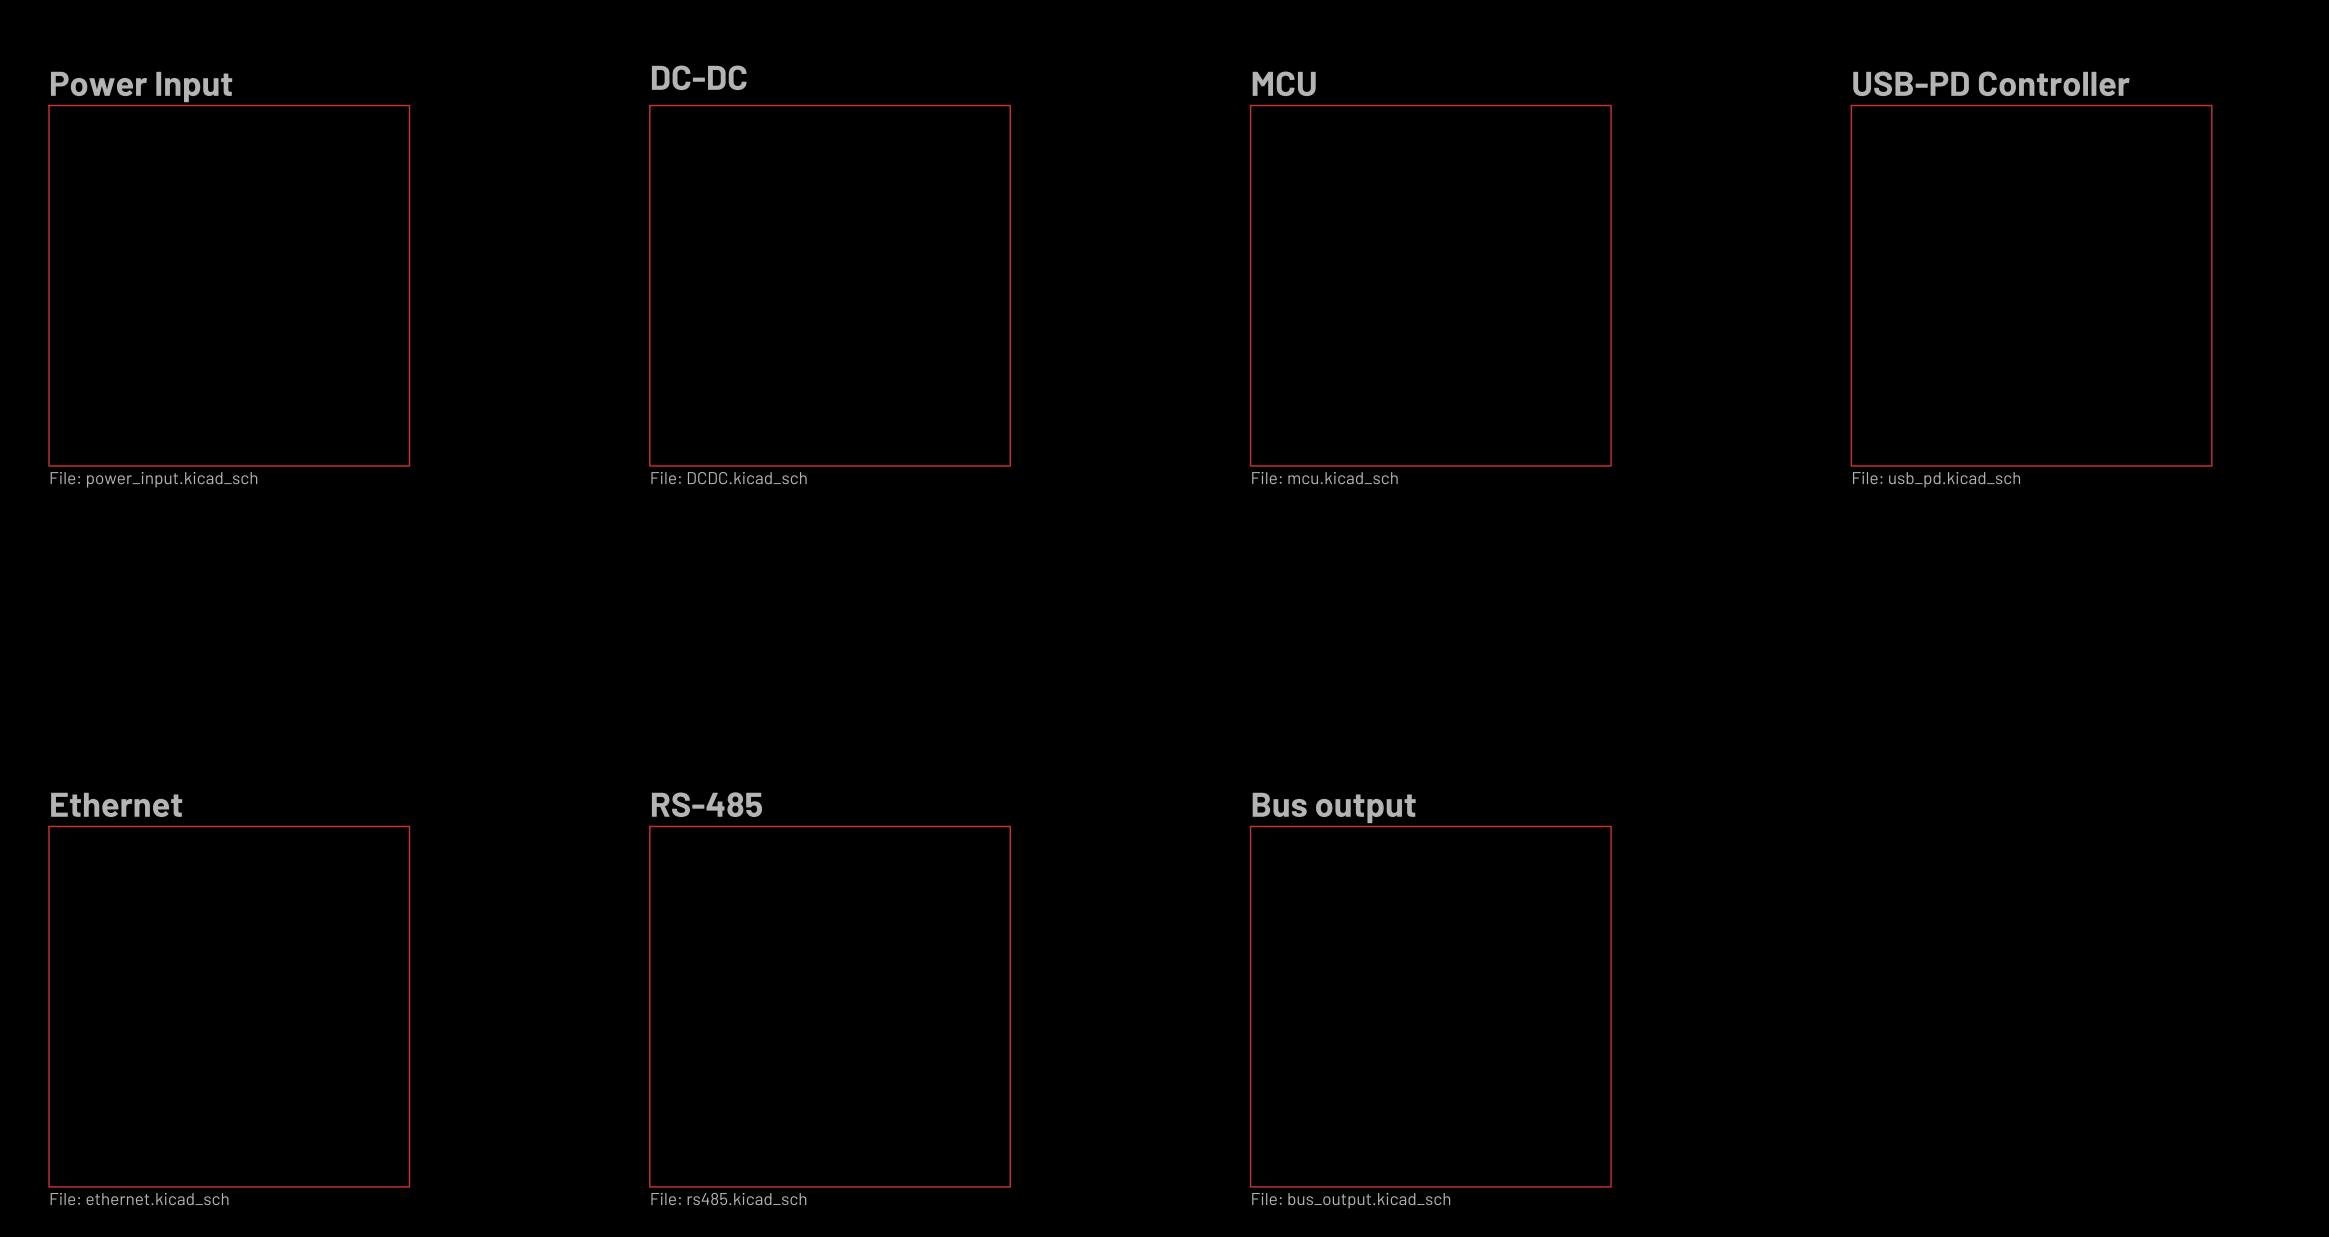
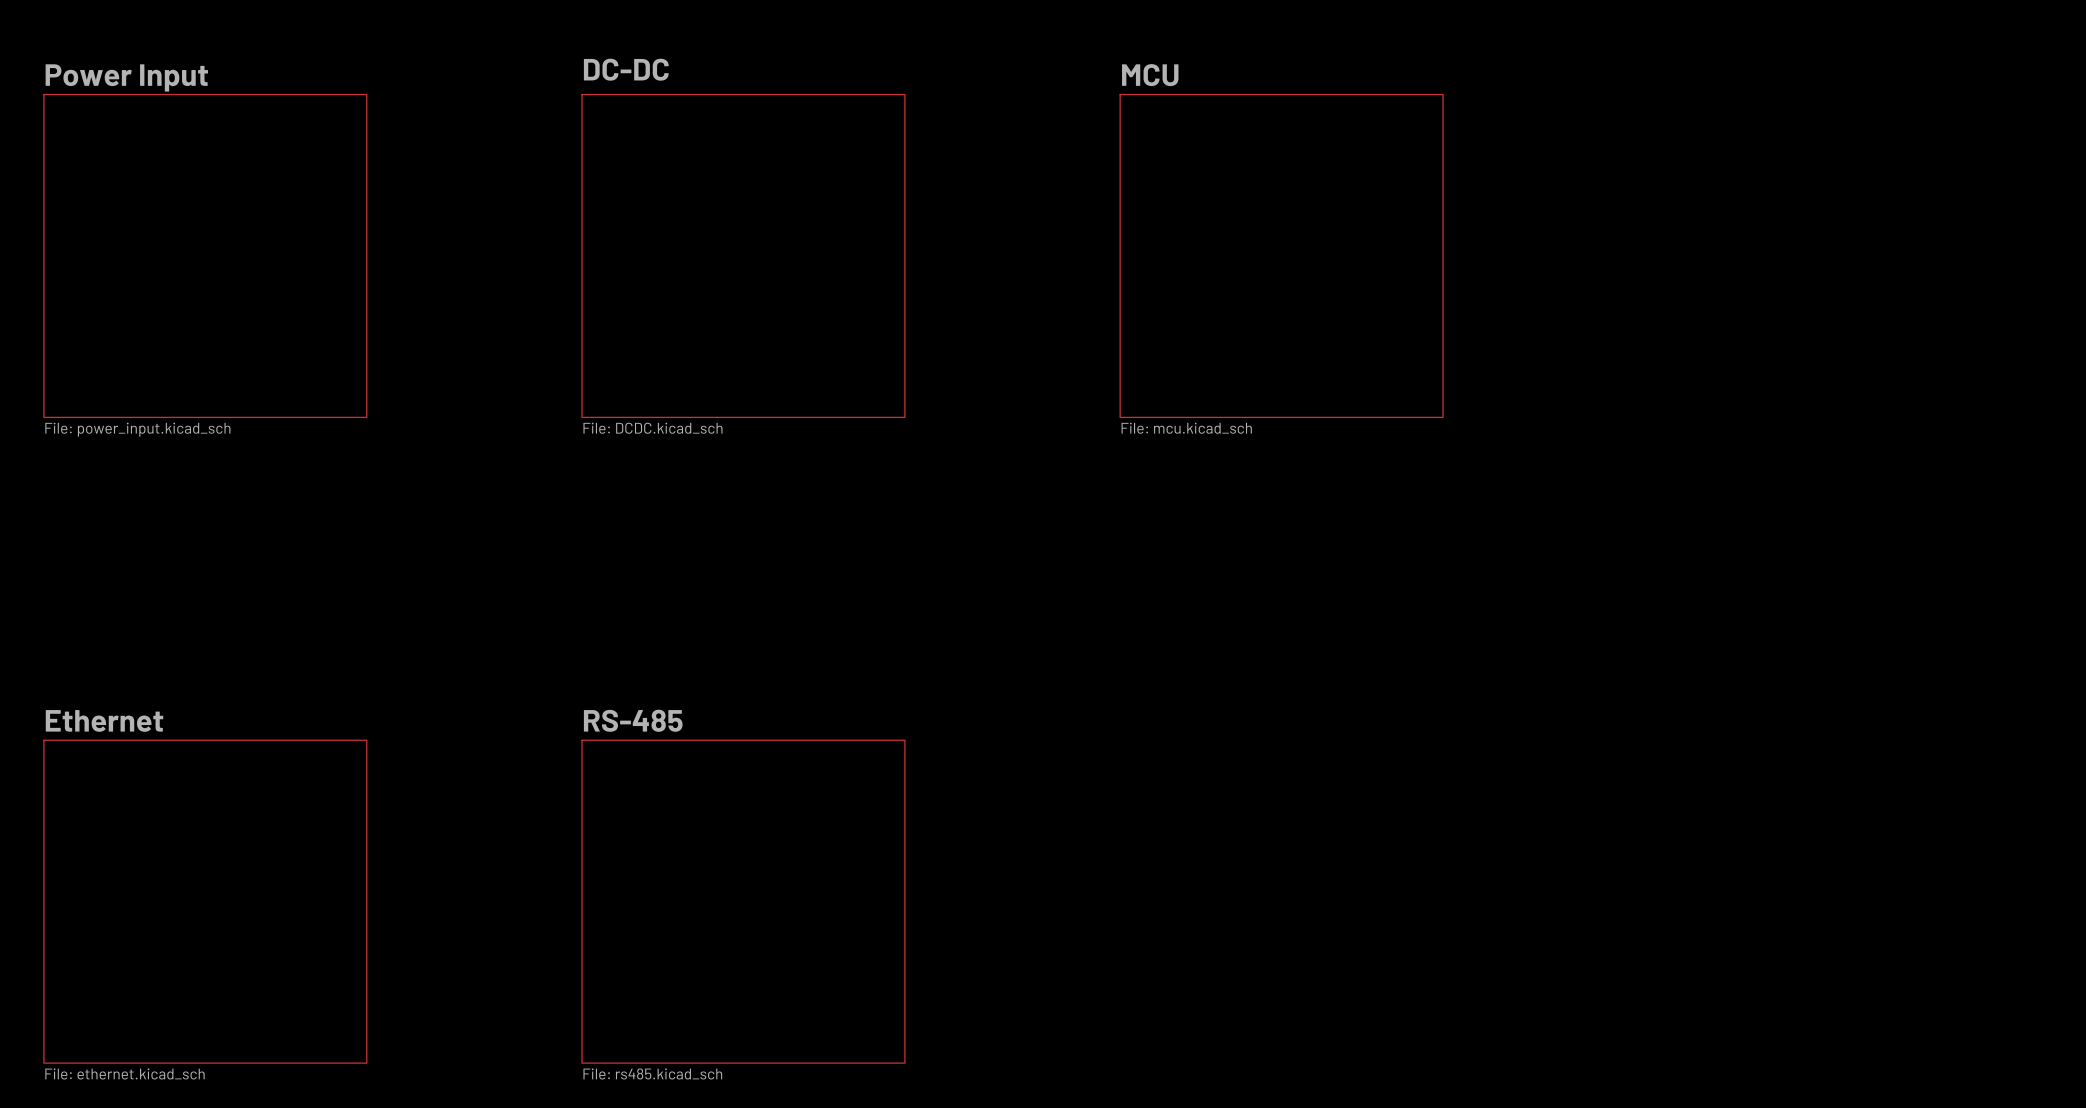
sheet USB-PD Controller: File: usb_pd.kicad_sch (2031, 285) -> none
sheet Bus output: File: bus_output.kicad_sch (1430, 1006) -> none

